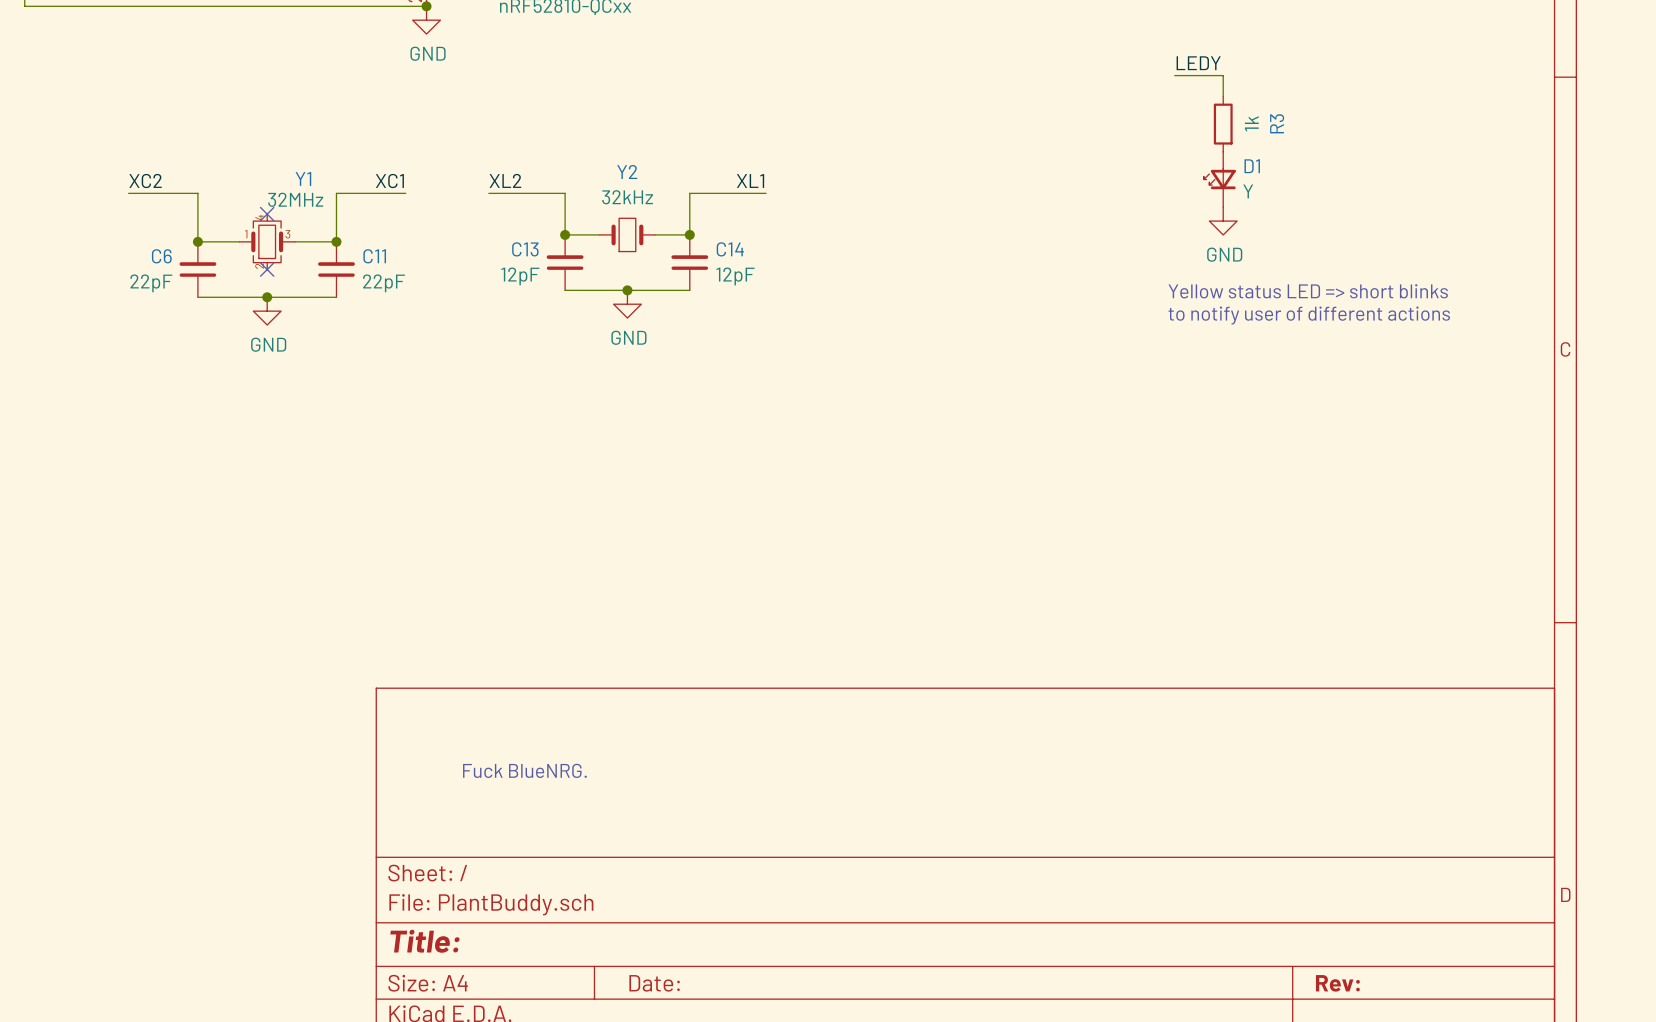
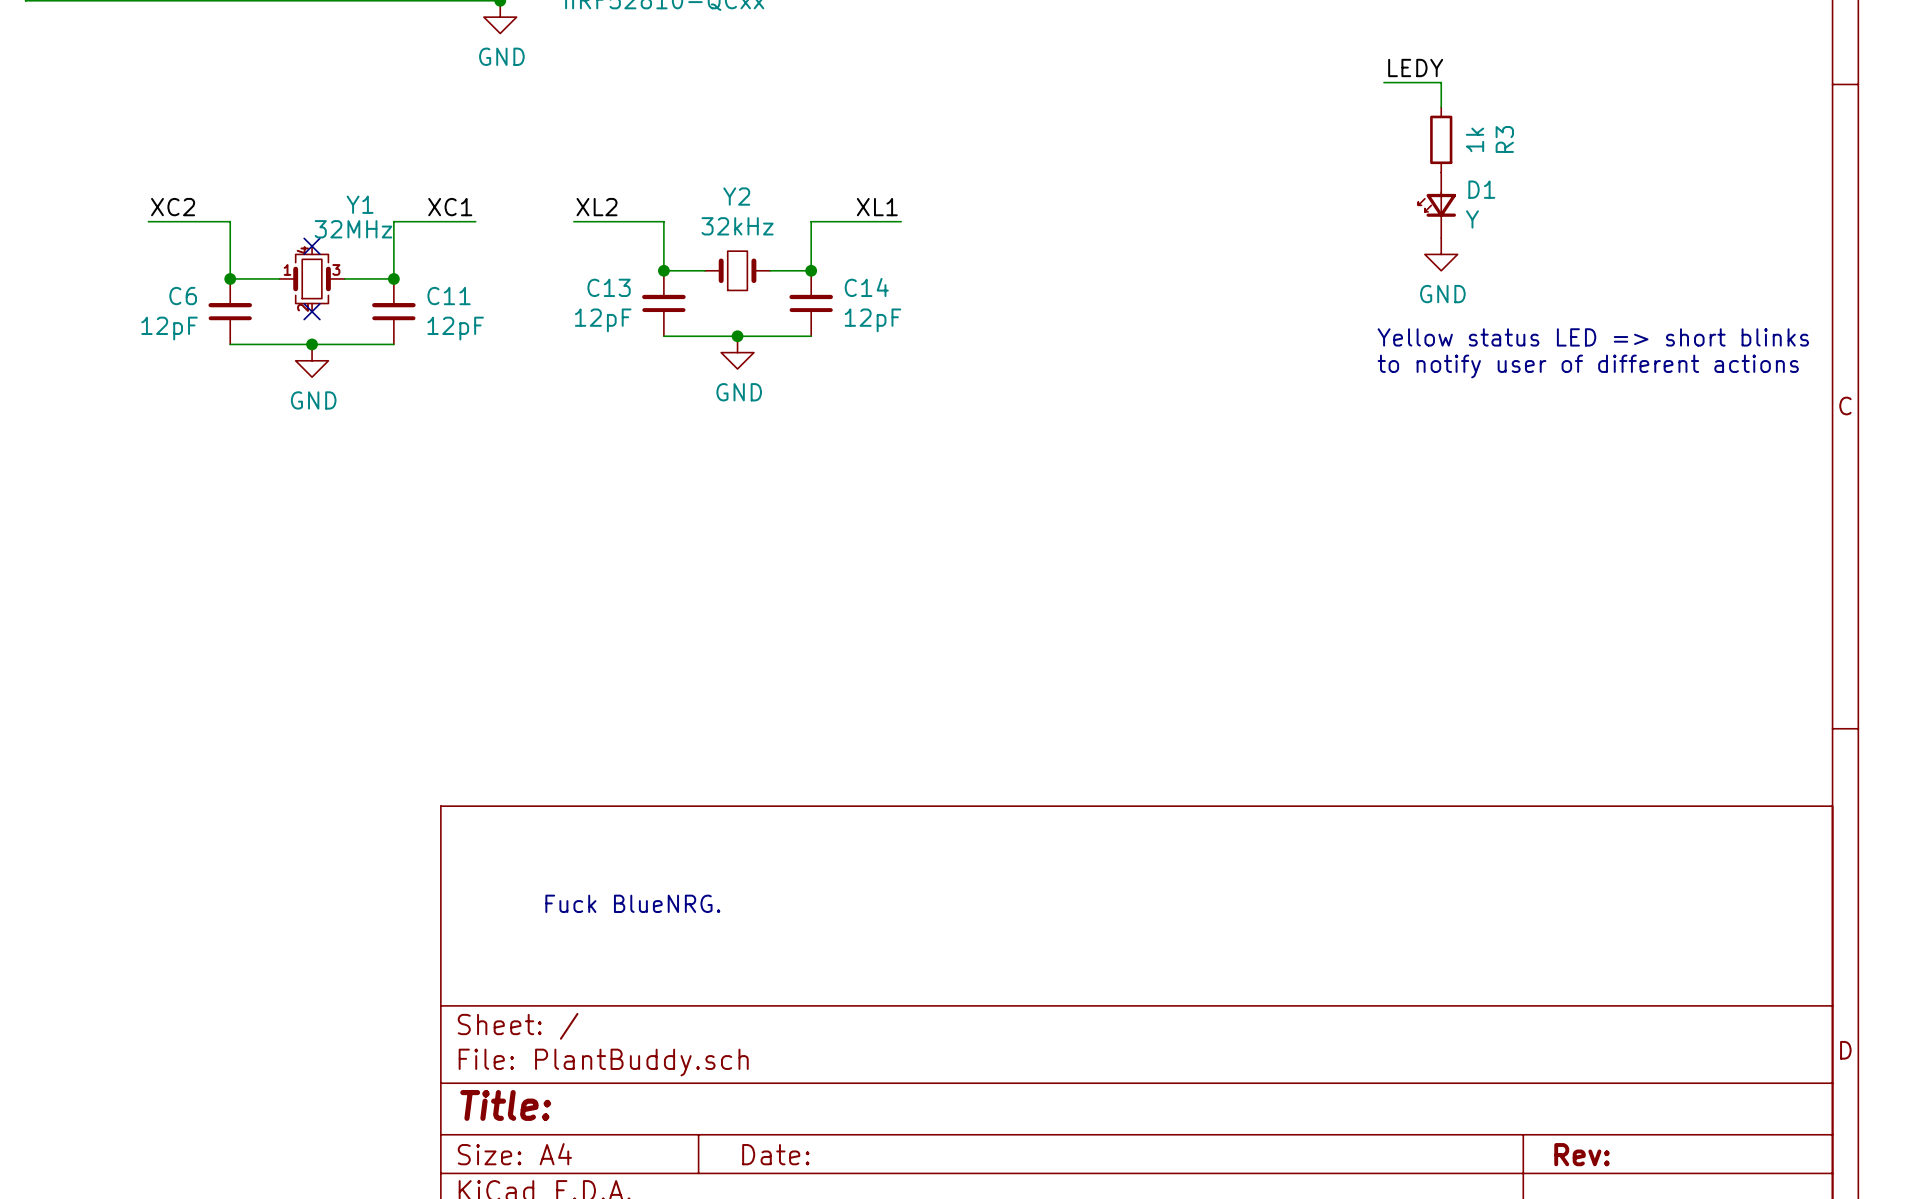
C6 value: 22pF (151, 283) -> 12pF (169, 328)
C11 value: 22pF (384, 283) -> 12pF (455, 328)

